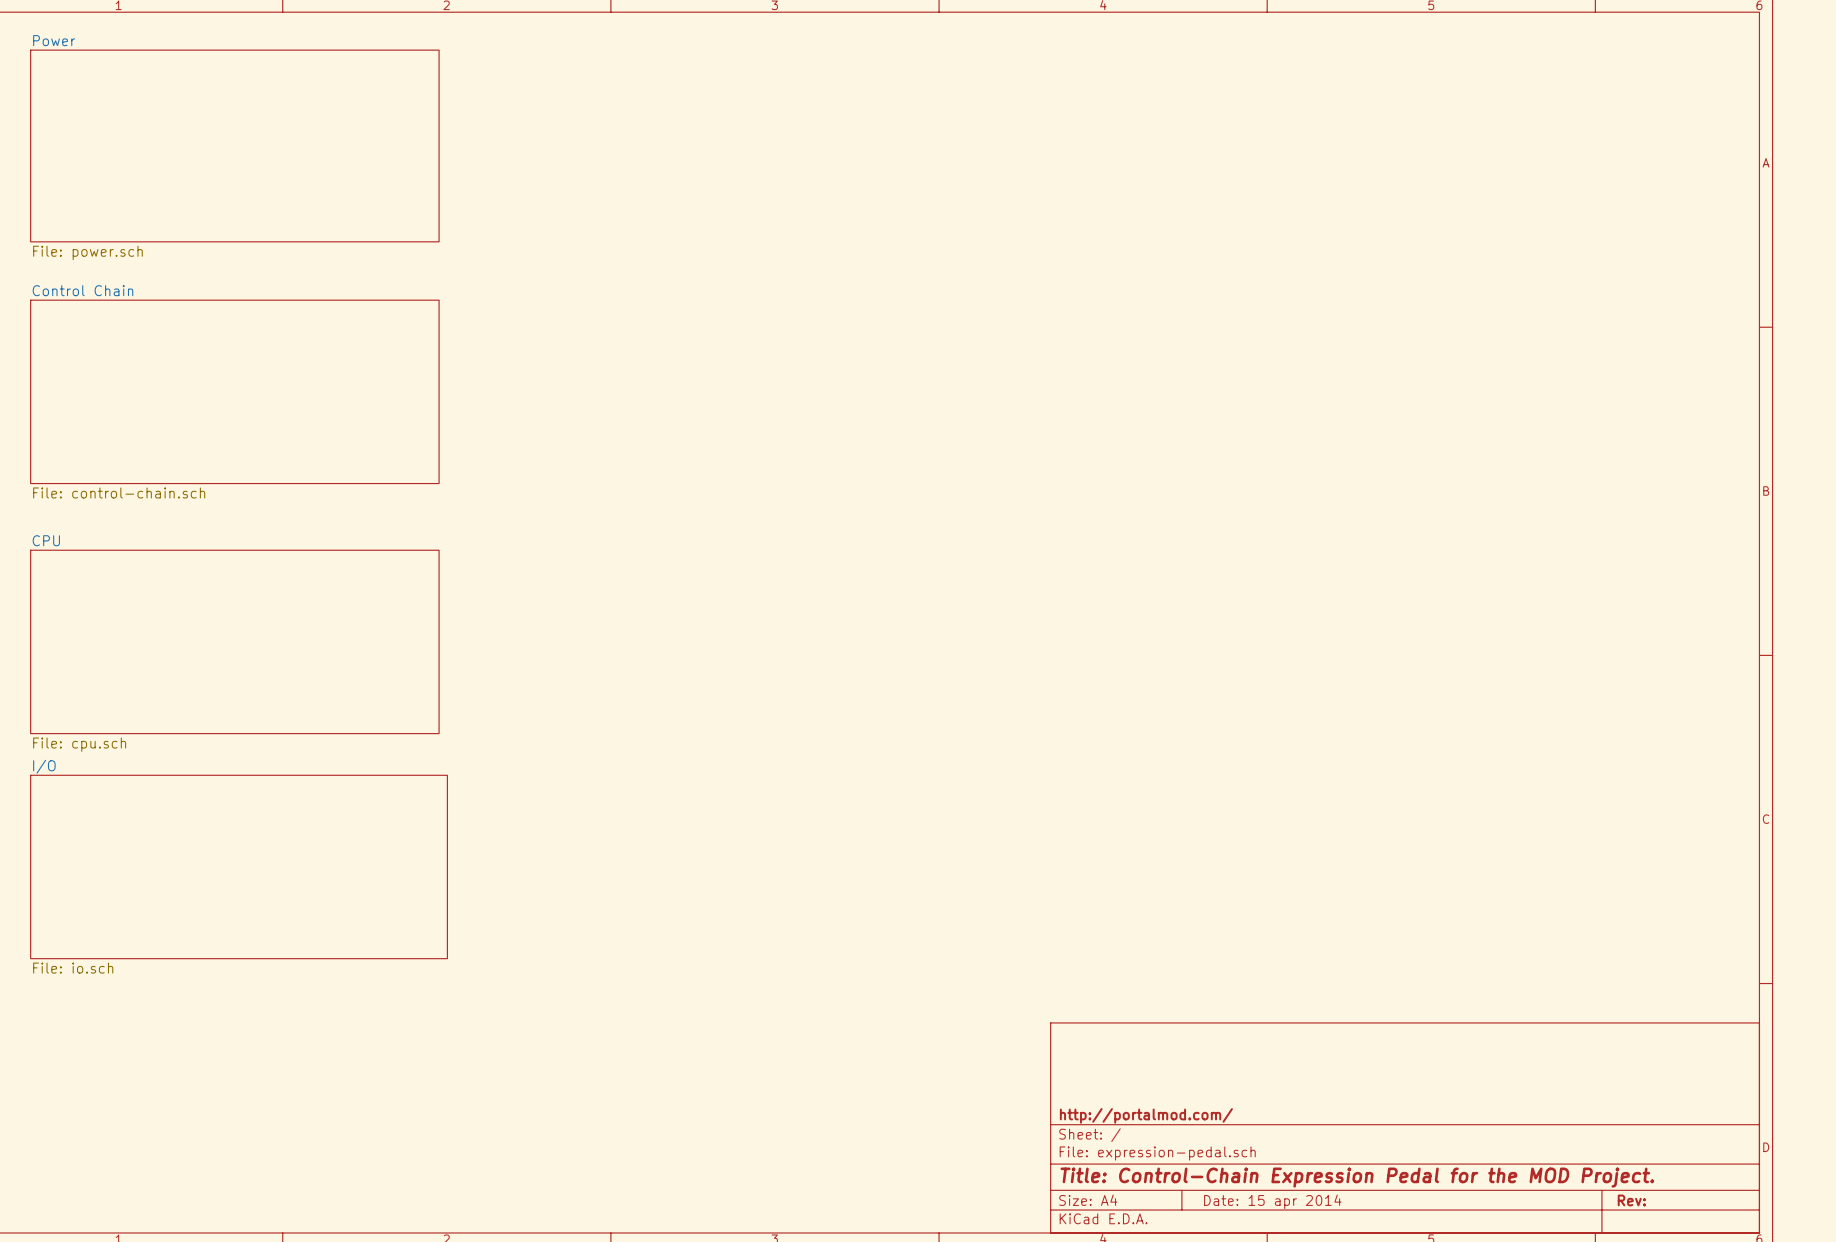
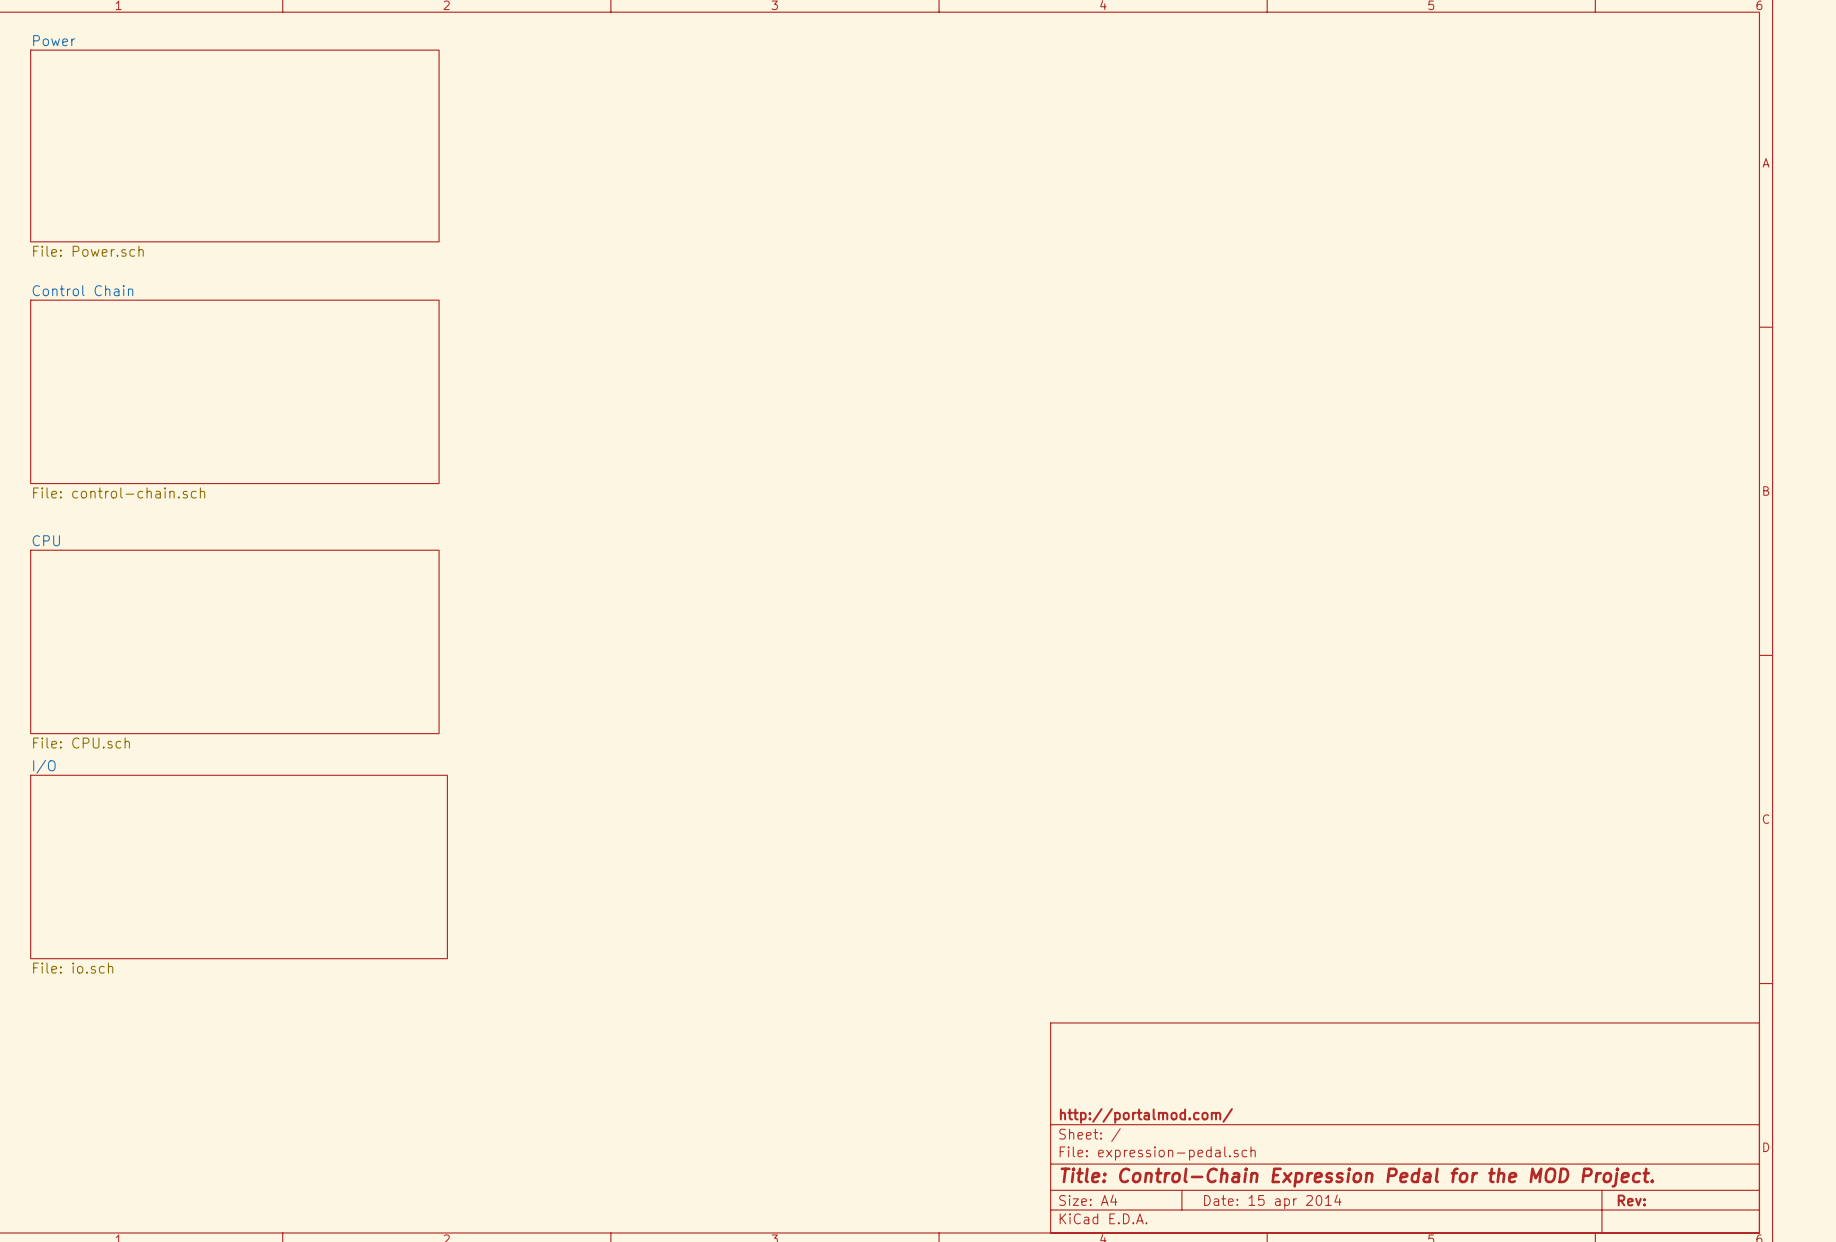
sheet Power value: File: power.sch (87, 252) -> File: Power.sch (88, 251)
sheet CPU value: File: cpu.sch (79, 744) -> File: CPU.sch (81, 743)

